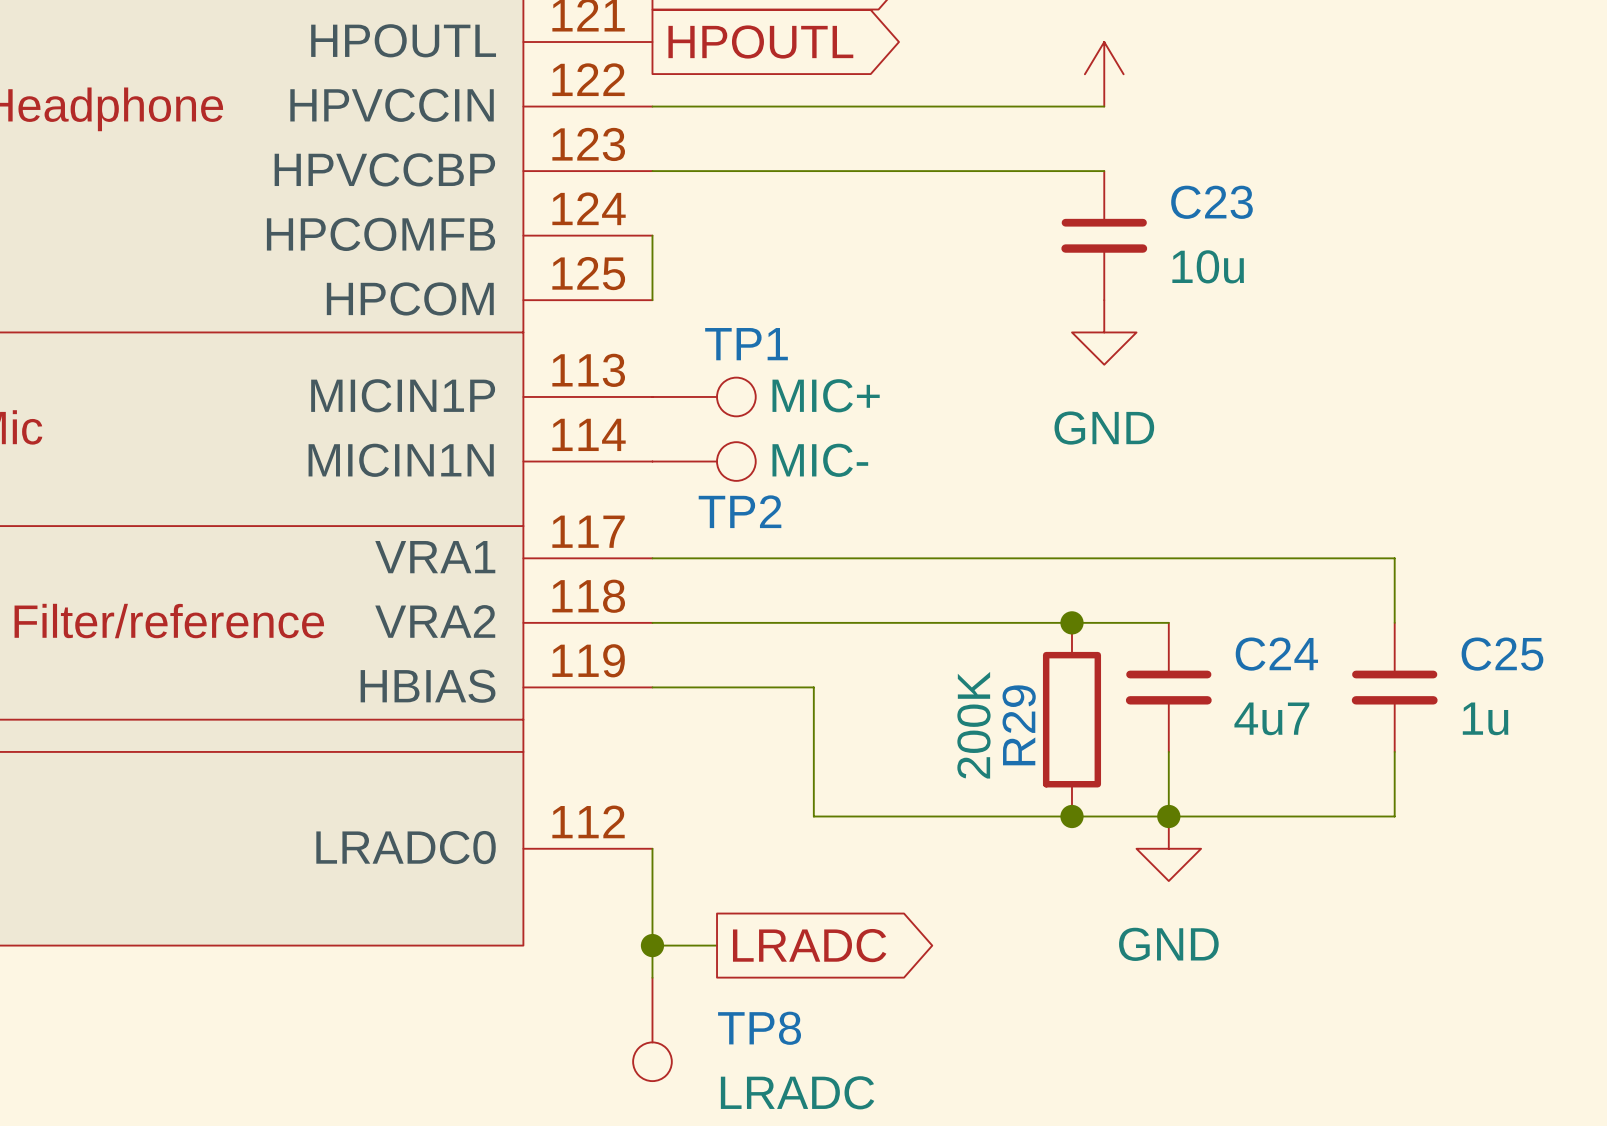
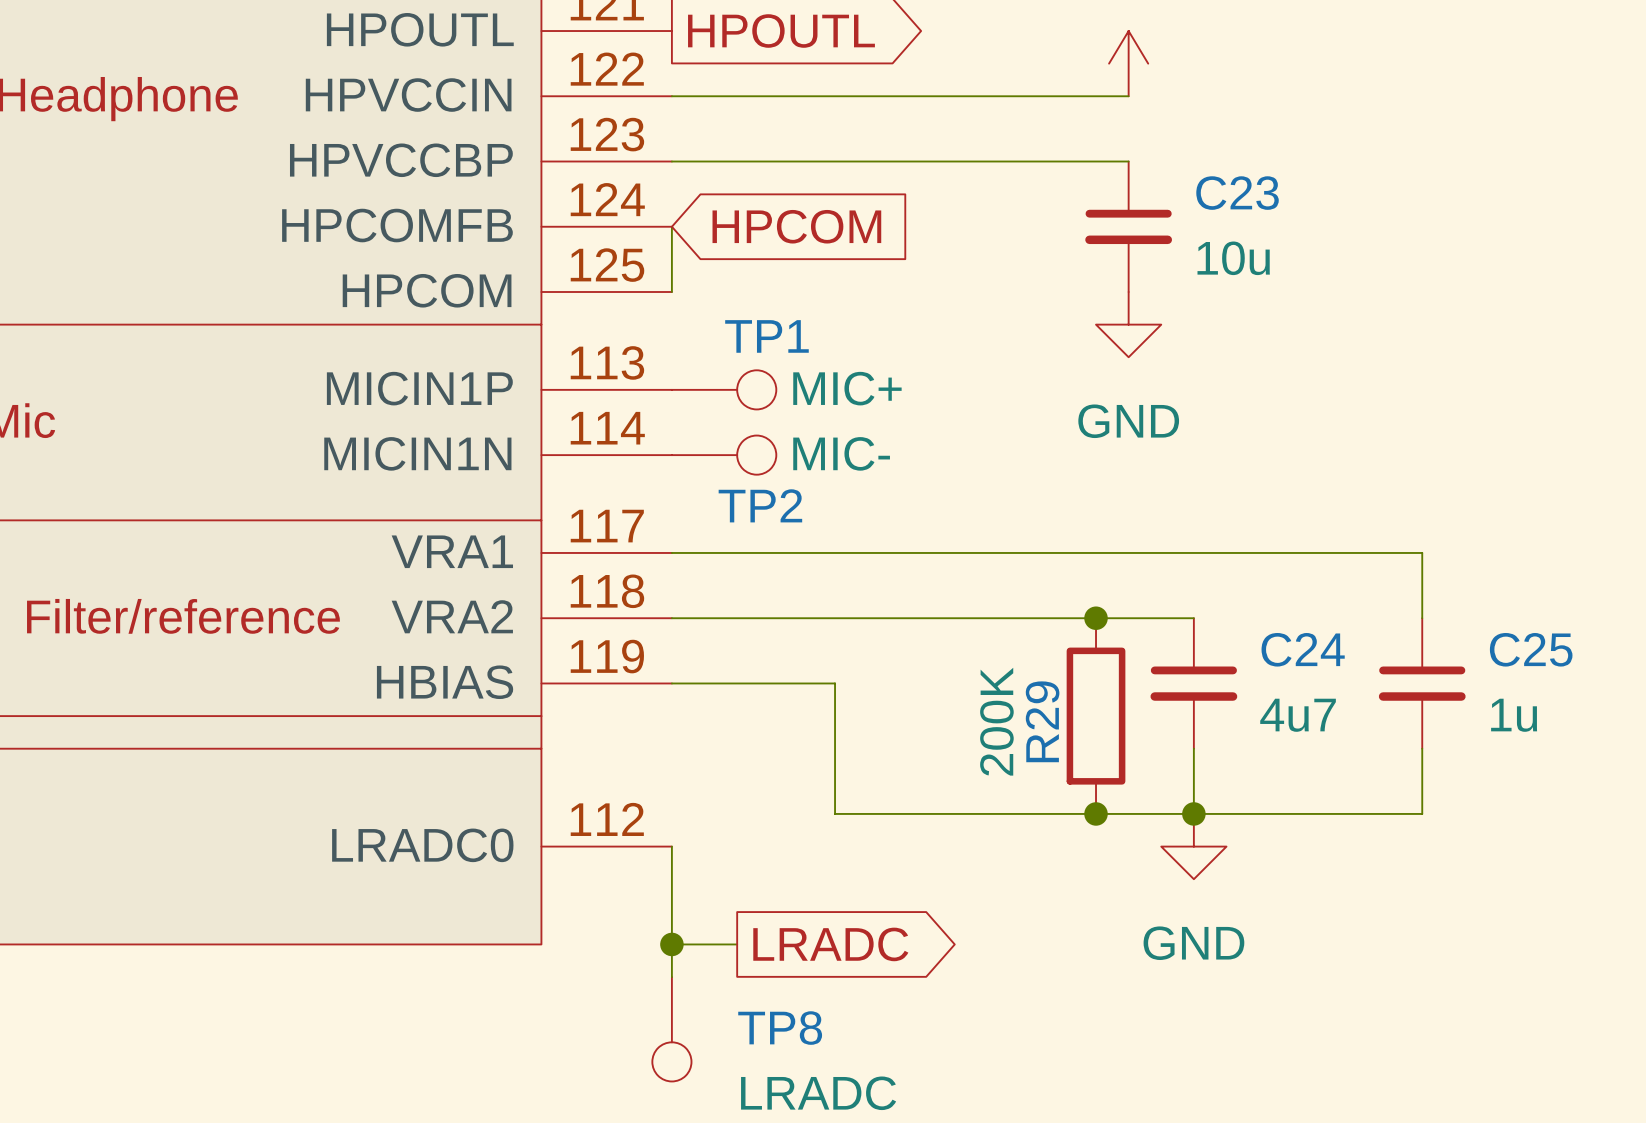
global label: none -> HPCOM (796, 226)

